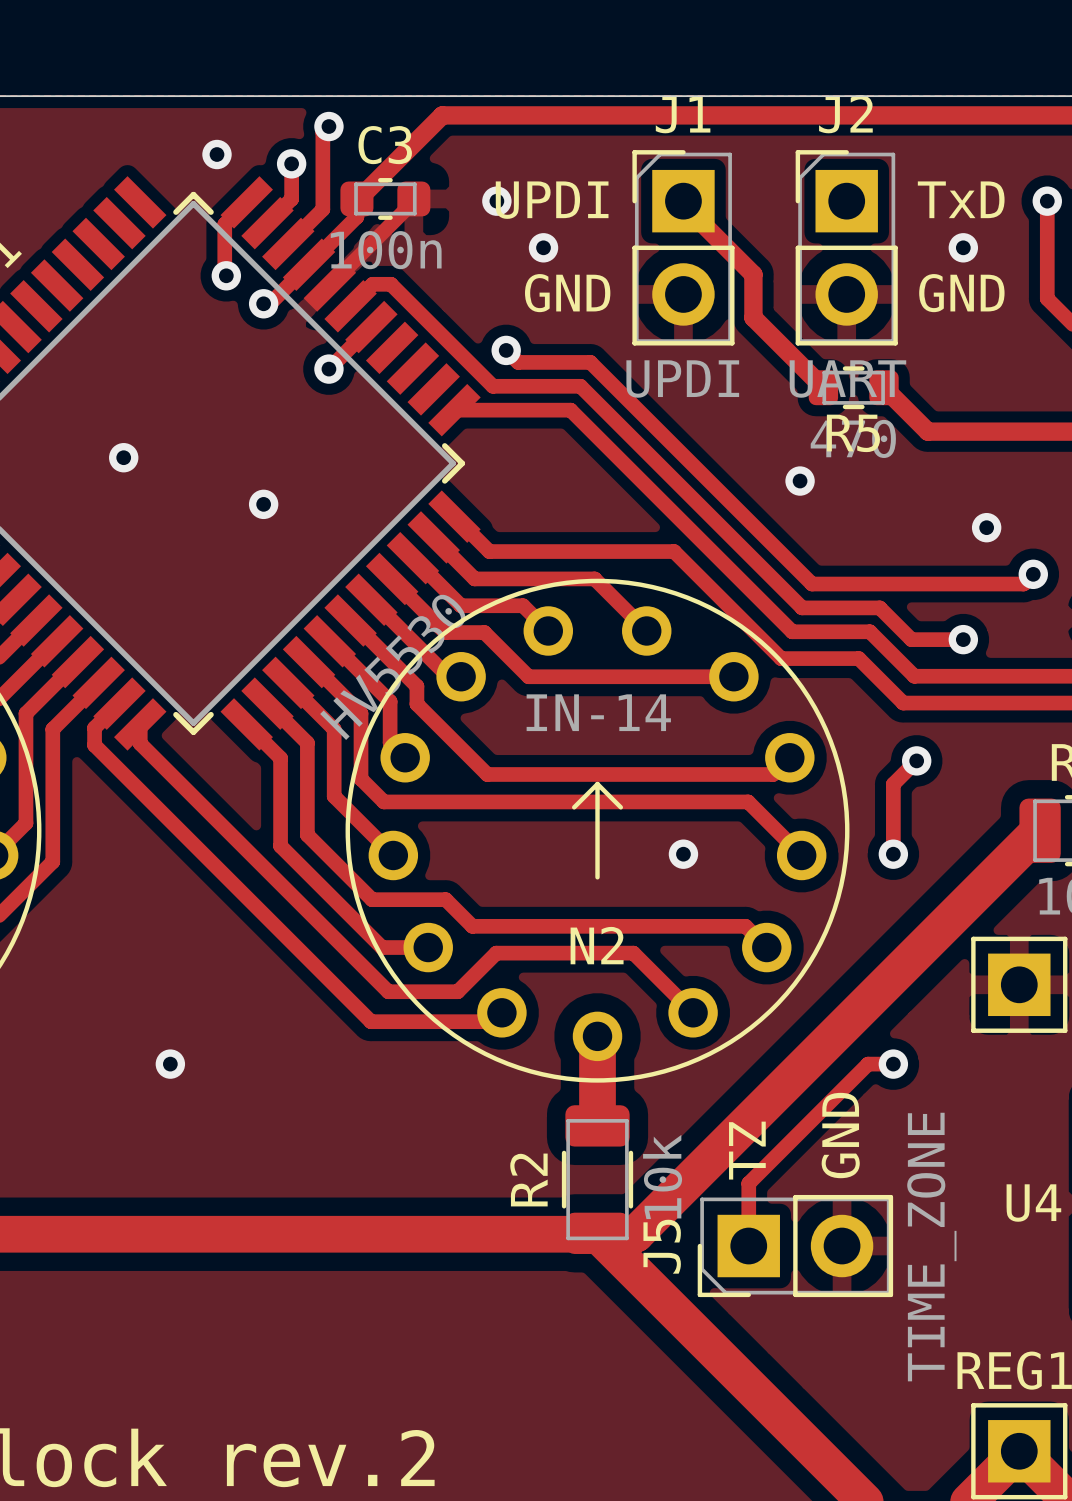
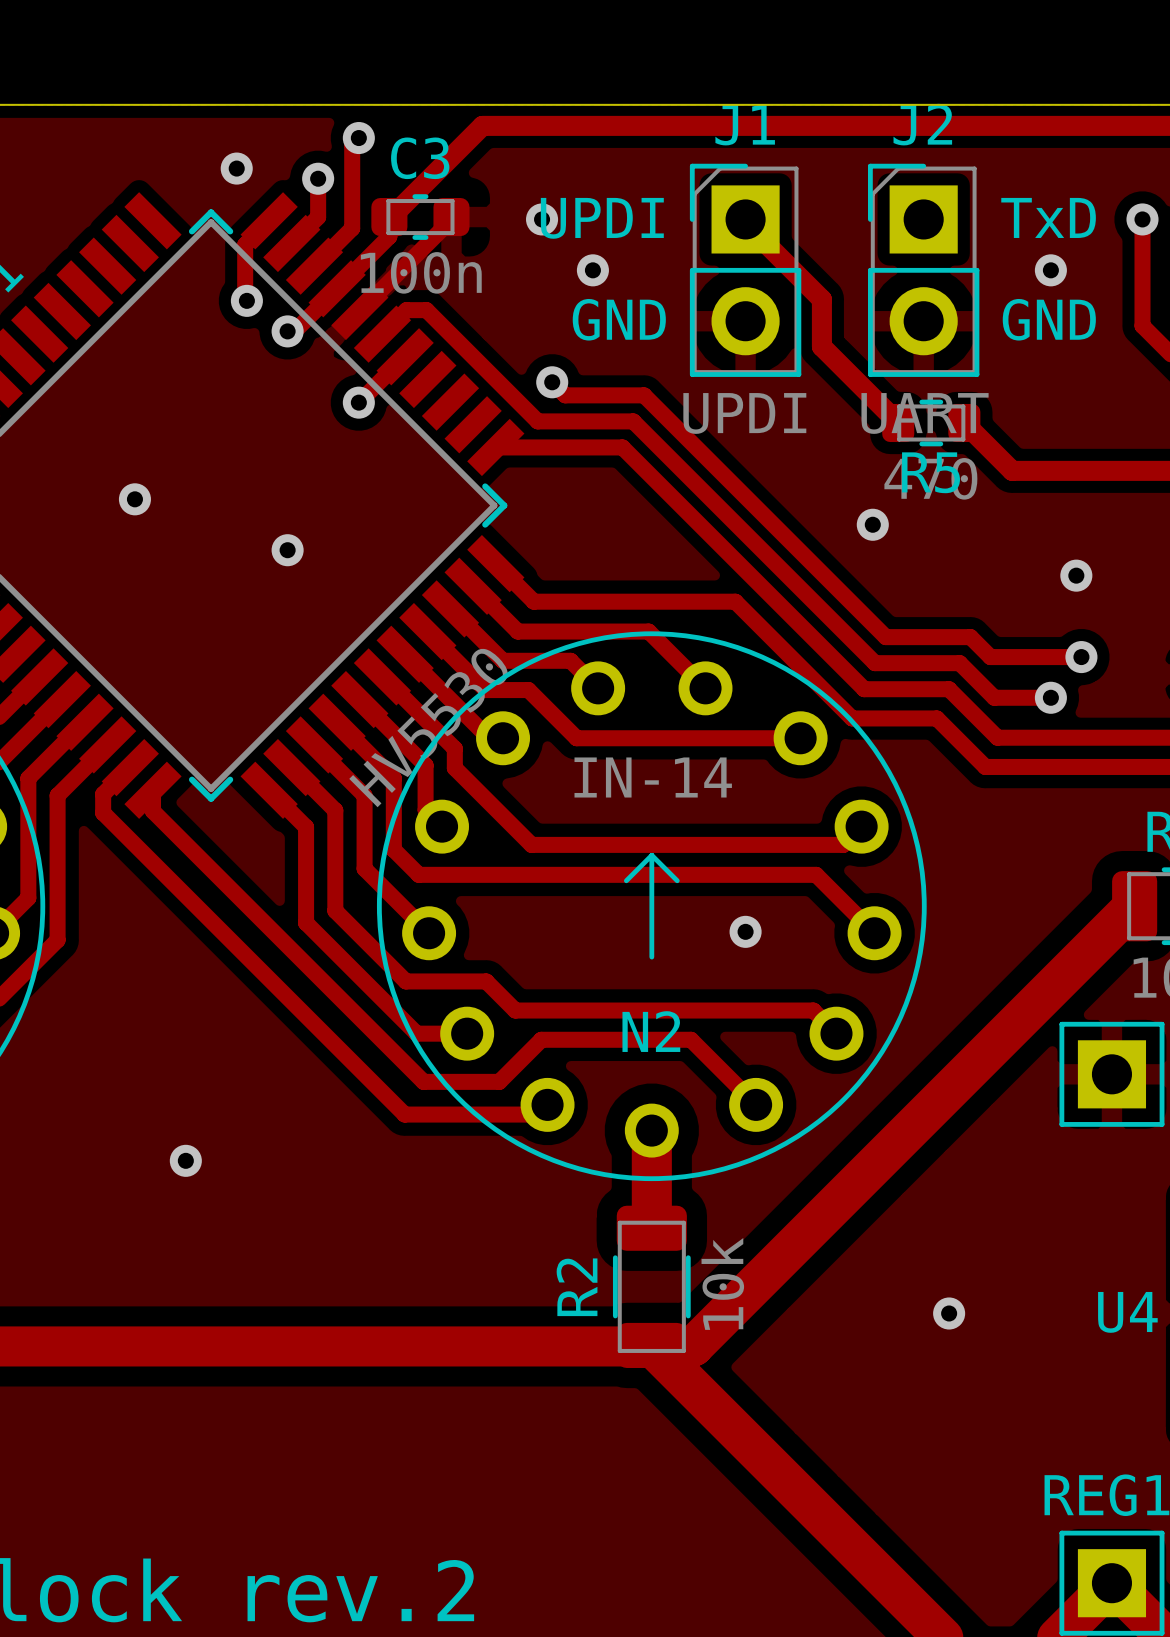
track: (1033, 574) (1023, 584) (889, 584) -> (1081, 657) (990, 657) (970, 637)
via position: (1033, 574) -> (1081, 657)
track: (916, 760) (893, 784) (893, 854) -> none
via: (916, 760) -> none
via: (893, 854) -> none
track: (893, 1064) (868, 1064) (748, 1183) (748, 1246) -> none
via position: (893, 1064) -> (949, 1313)
text: GND (840, 1135) -> none
text: TZ (747, 1150) -> none
J5: TIME_ZONE (795, 1246) -> none

